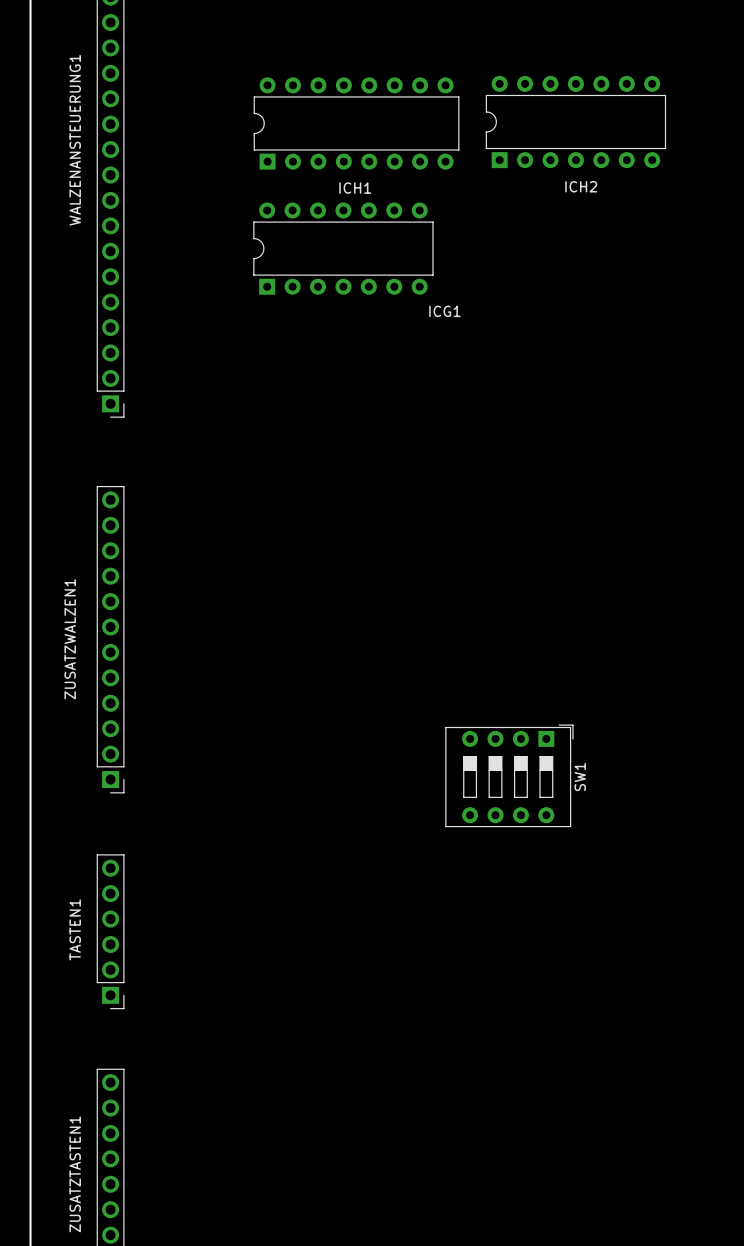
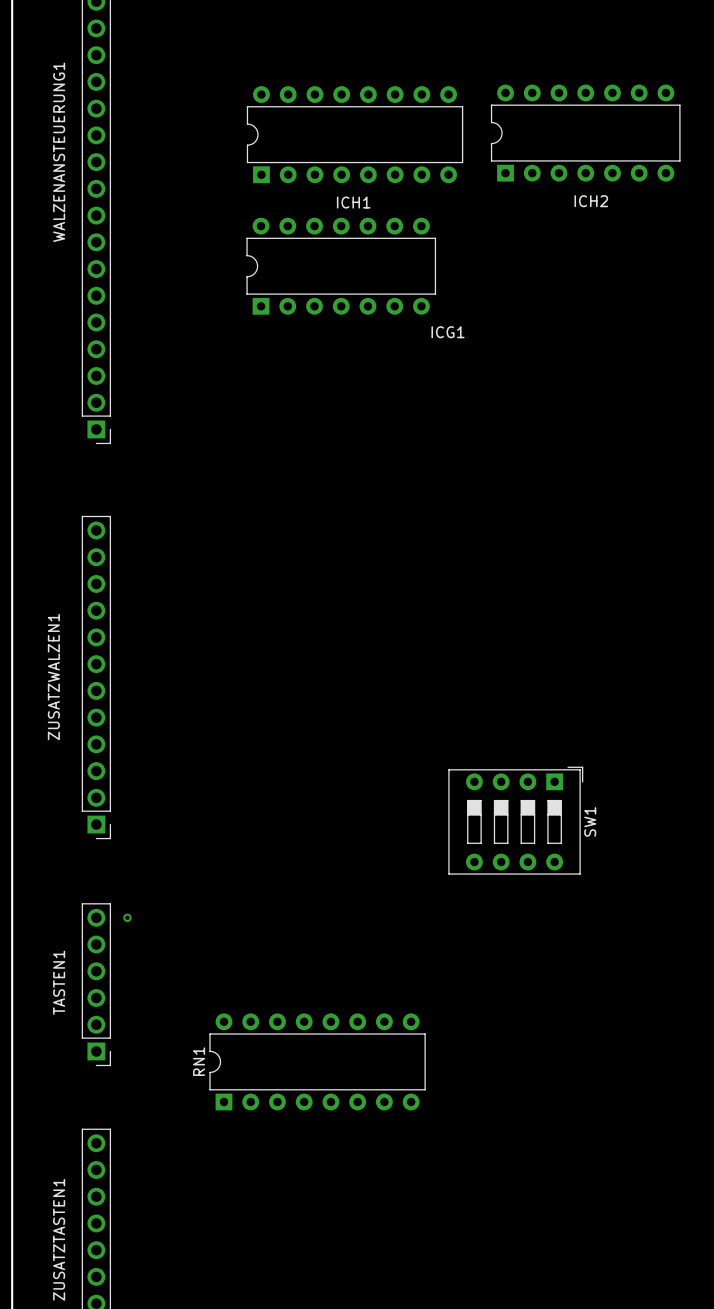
via: none -> (127, 917)
RN1: none -> (317, 1061)

